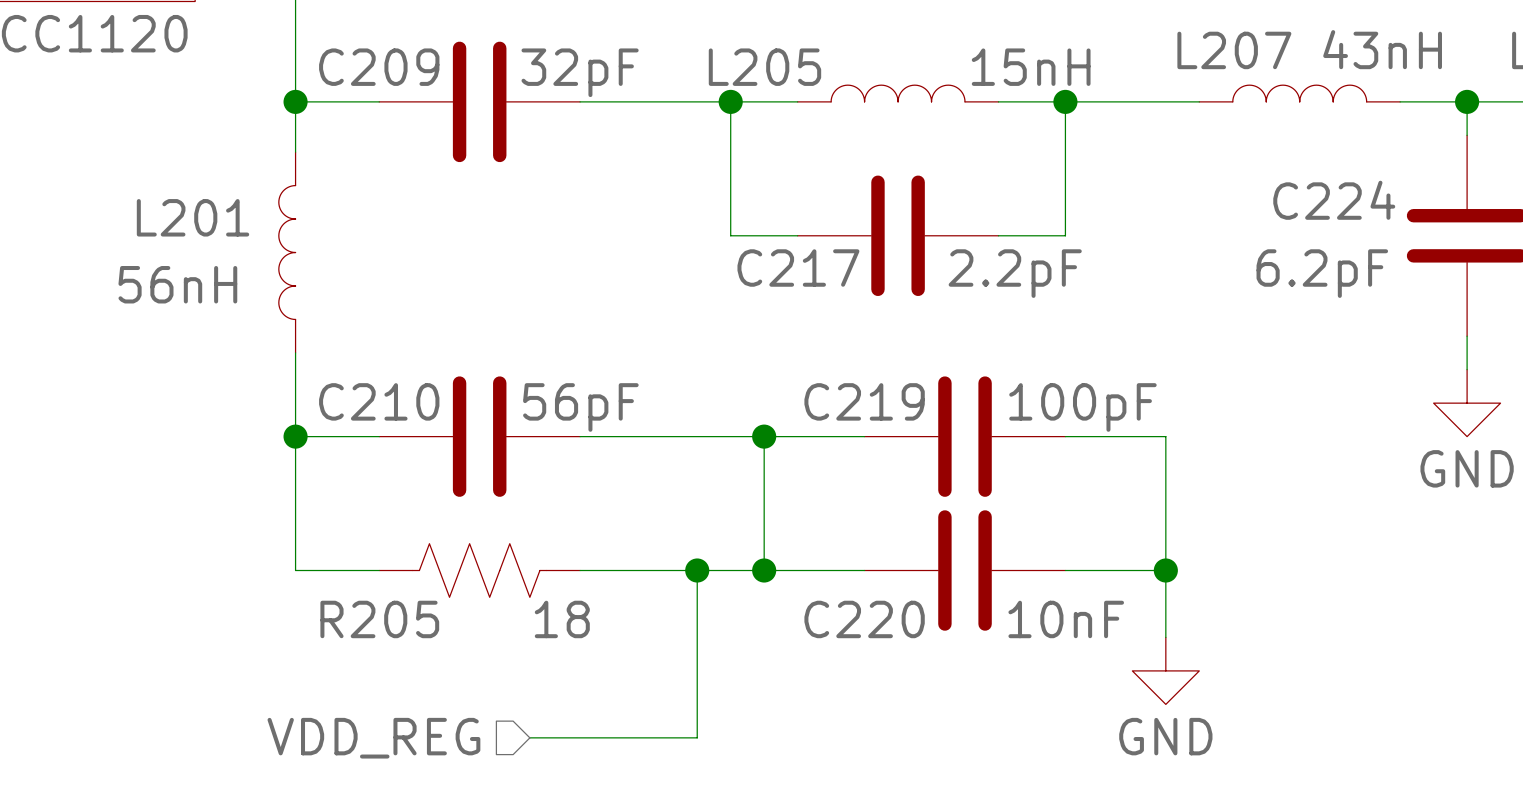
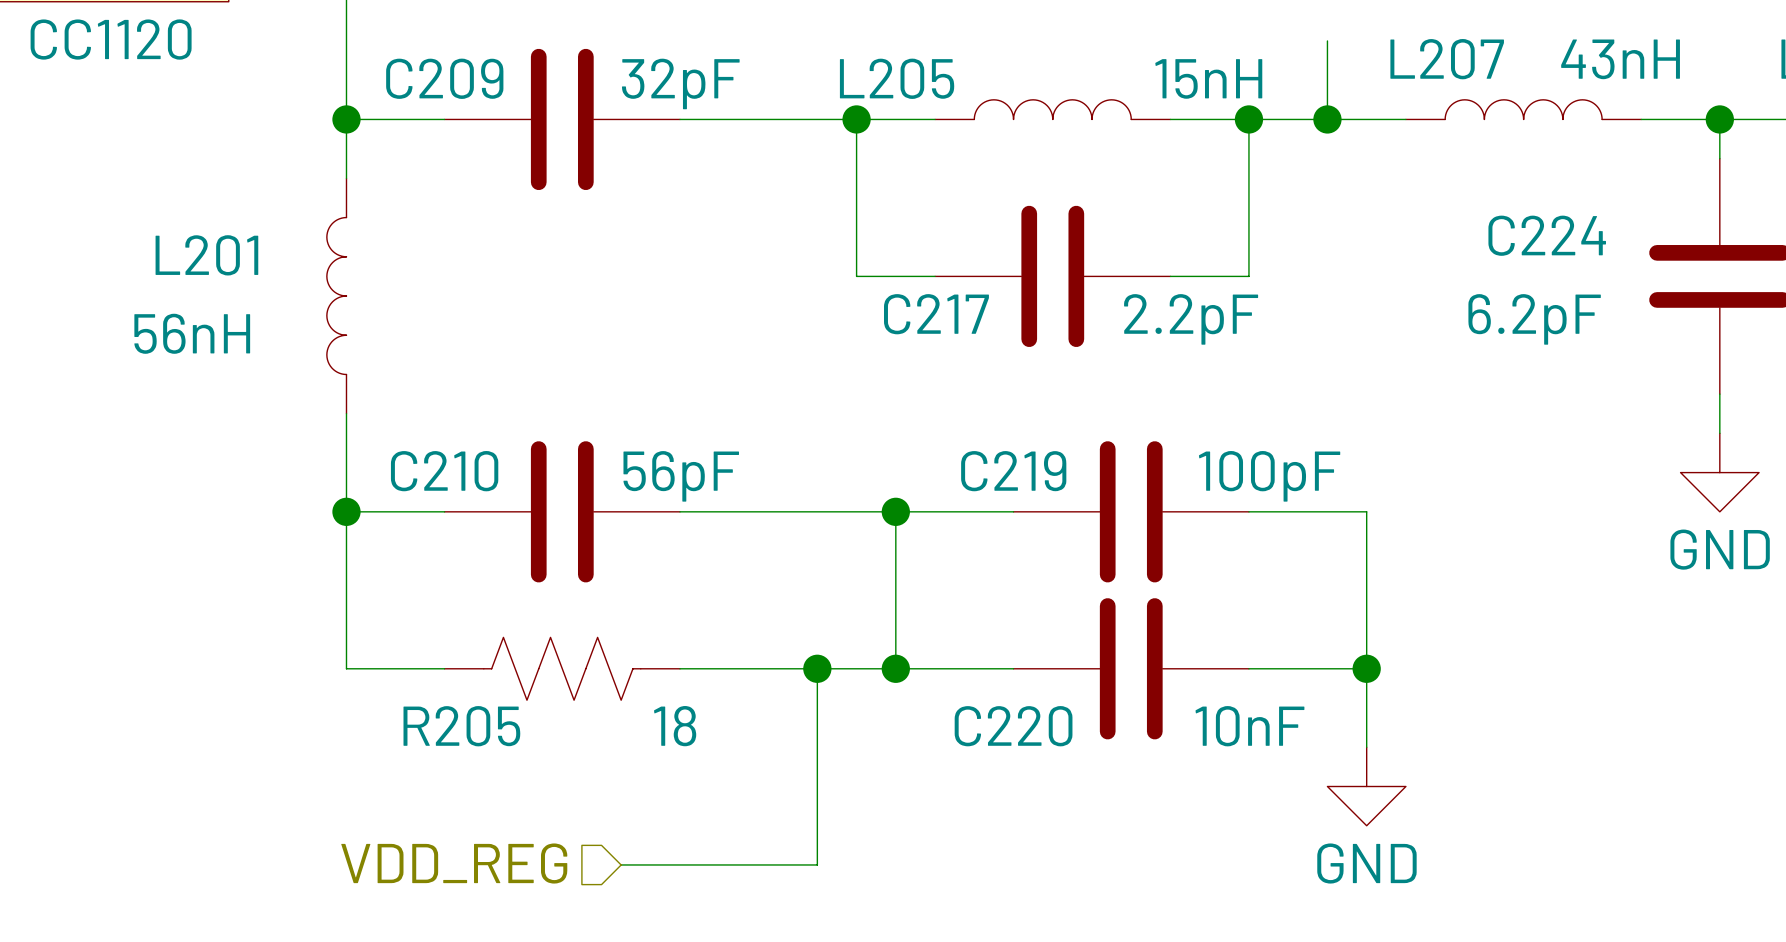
wire: none -> (1327, 40) (1327, 119)
junction: none -> (1327, 119)

